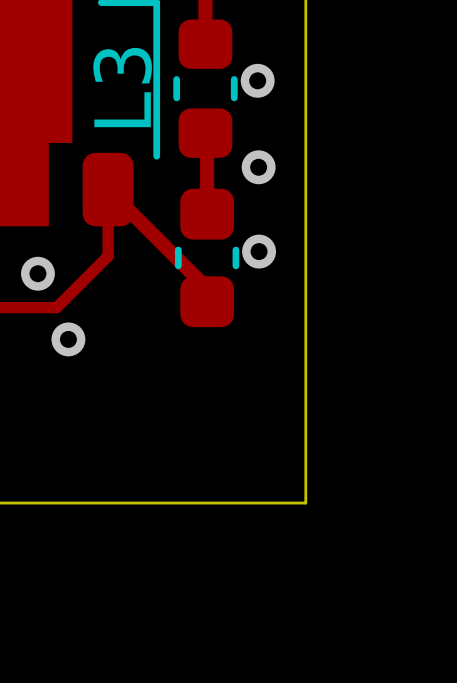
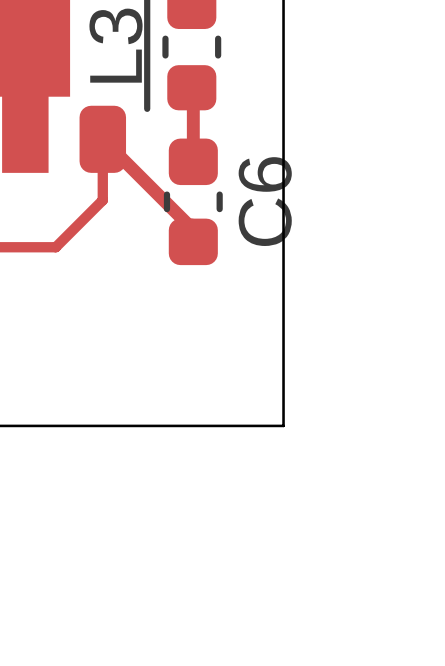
via: (257, 80) -> none
via: (258, 167) -> none
via: (259, 251) -> none
C6 name: none -> C6 (265, 201)
via: (37, 273) -> none
via: (68, 339) -> none

